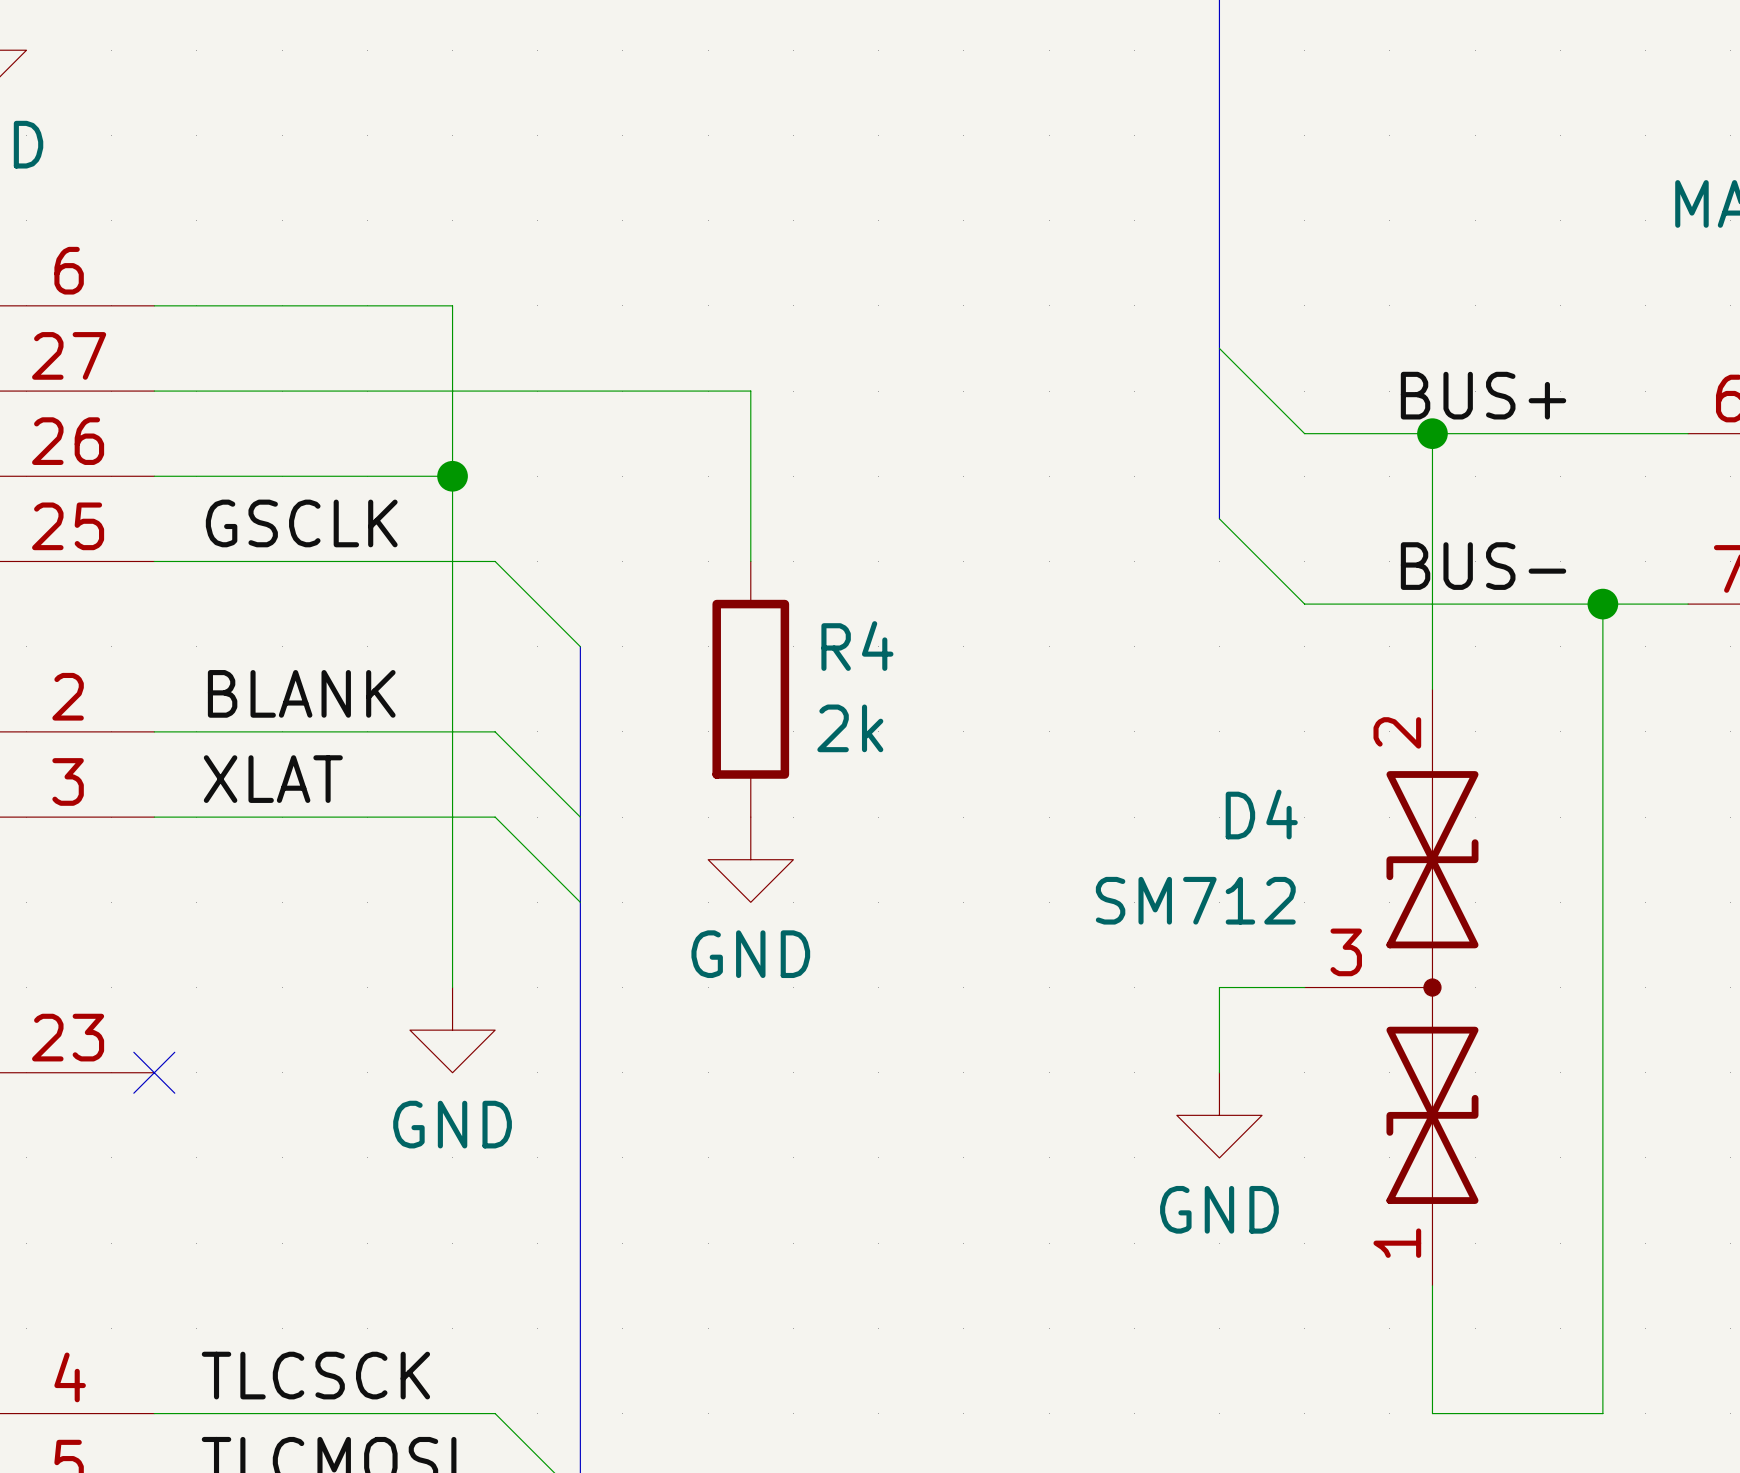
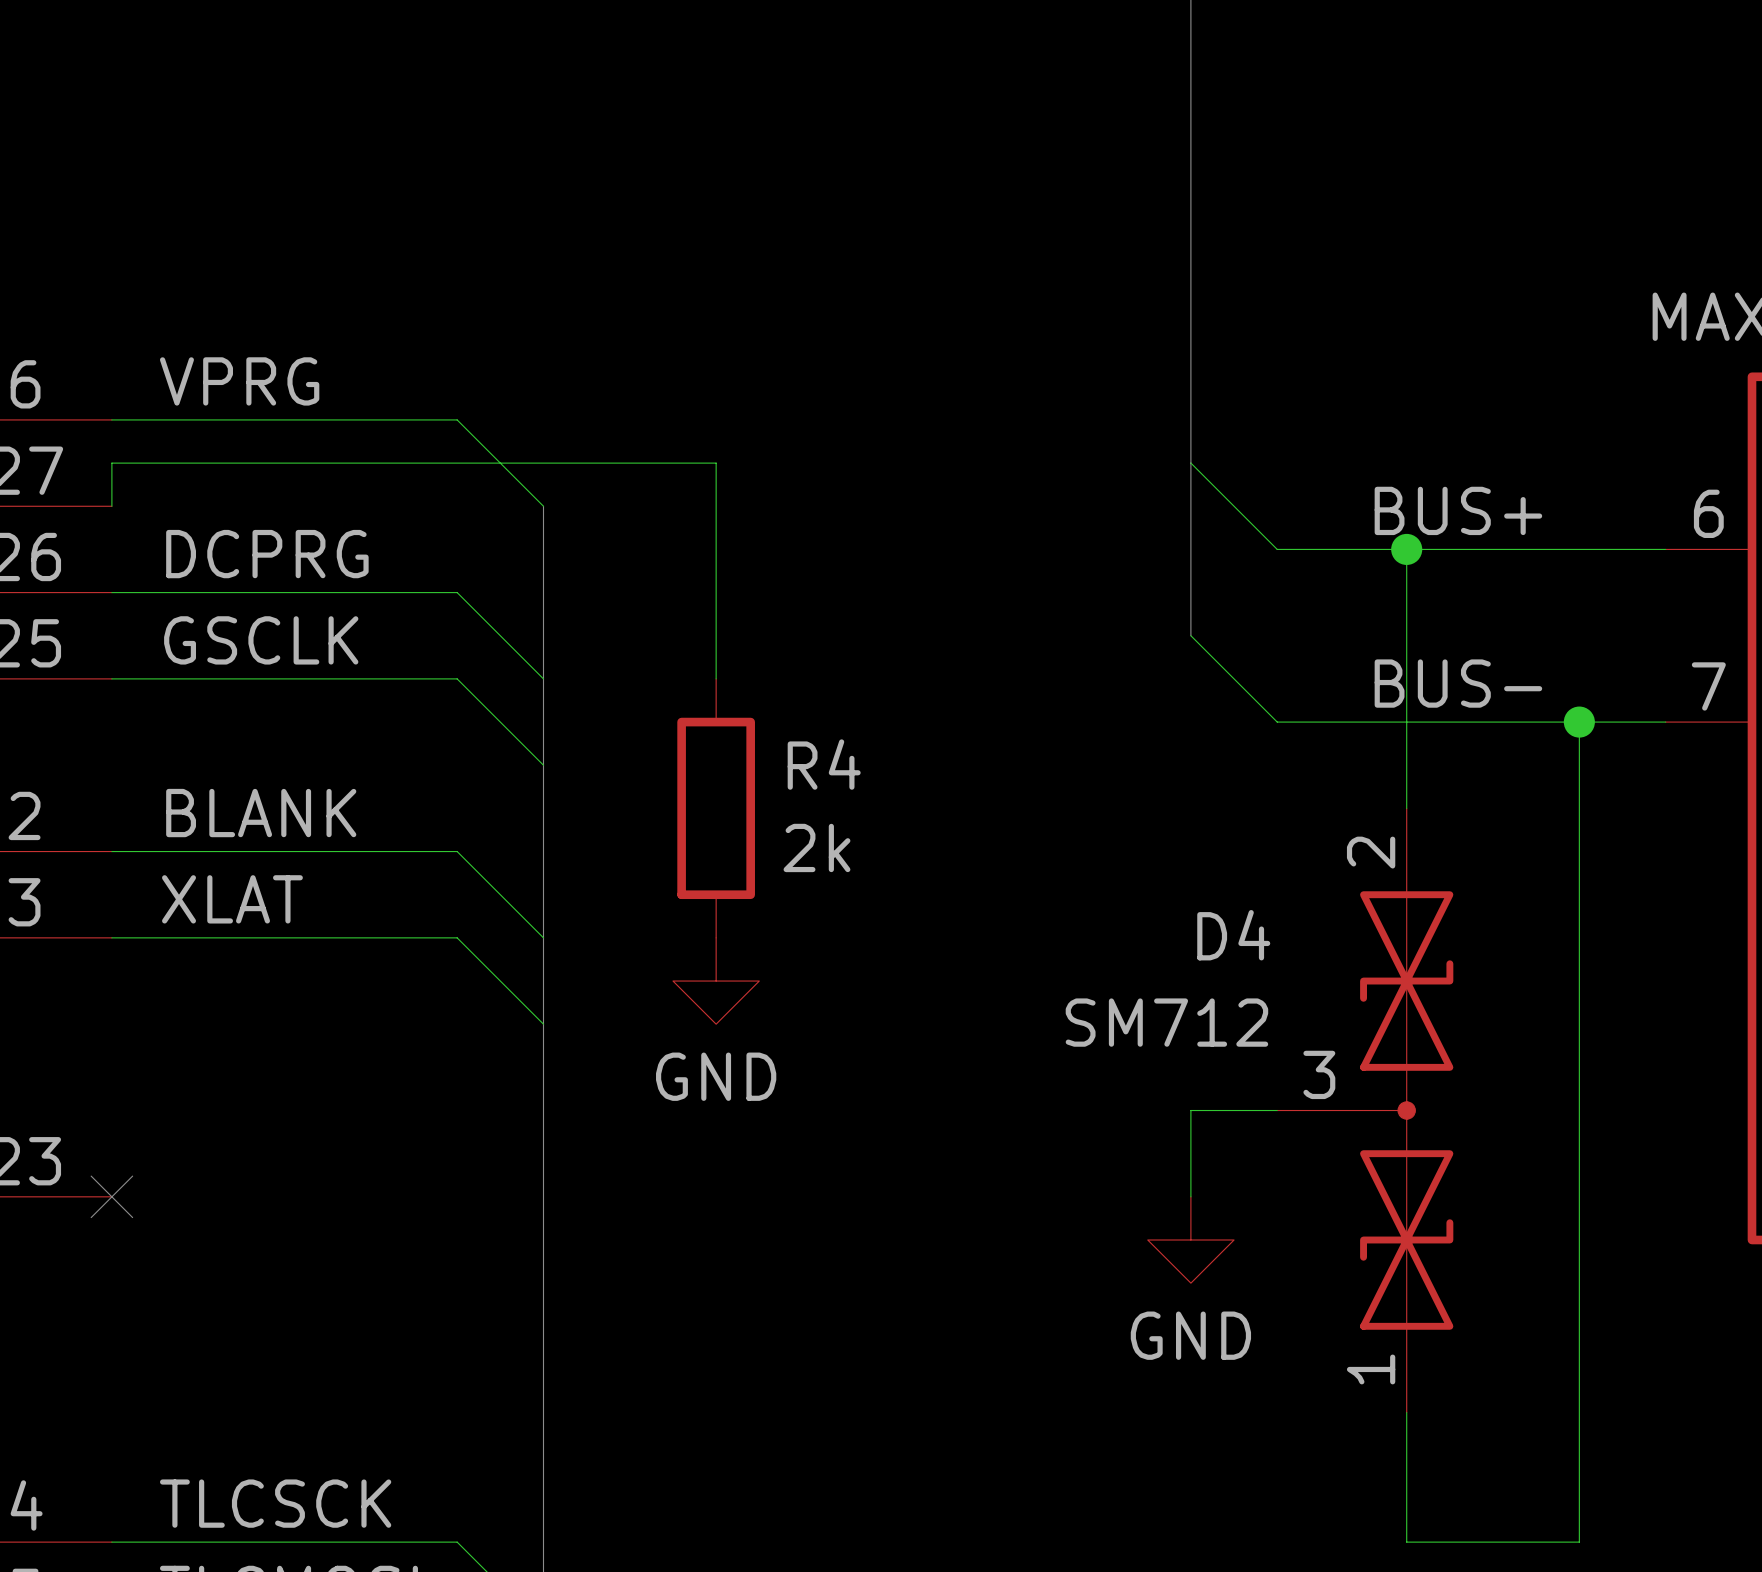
label: none -> VPRG (239, 381)
wire: (452, 305) (452, 987) -> (414, 419) (457, 419) (543, 506)
wire: (154, 391) (750, 391) -> (111, 506) (111, 463) (716, 463) (716, 506)
bus: none -> (543, 506) (543, 765)
label: none -> DCPRG (267, 554)
wire: none -> (414, 592) (457, 592) (543, 678)
junction: (452, 476) -> none
power symbol: GND (452, 1030) -> none

